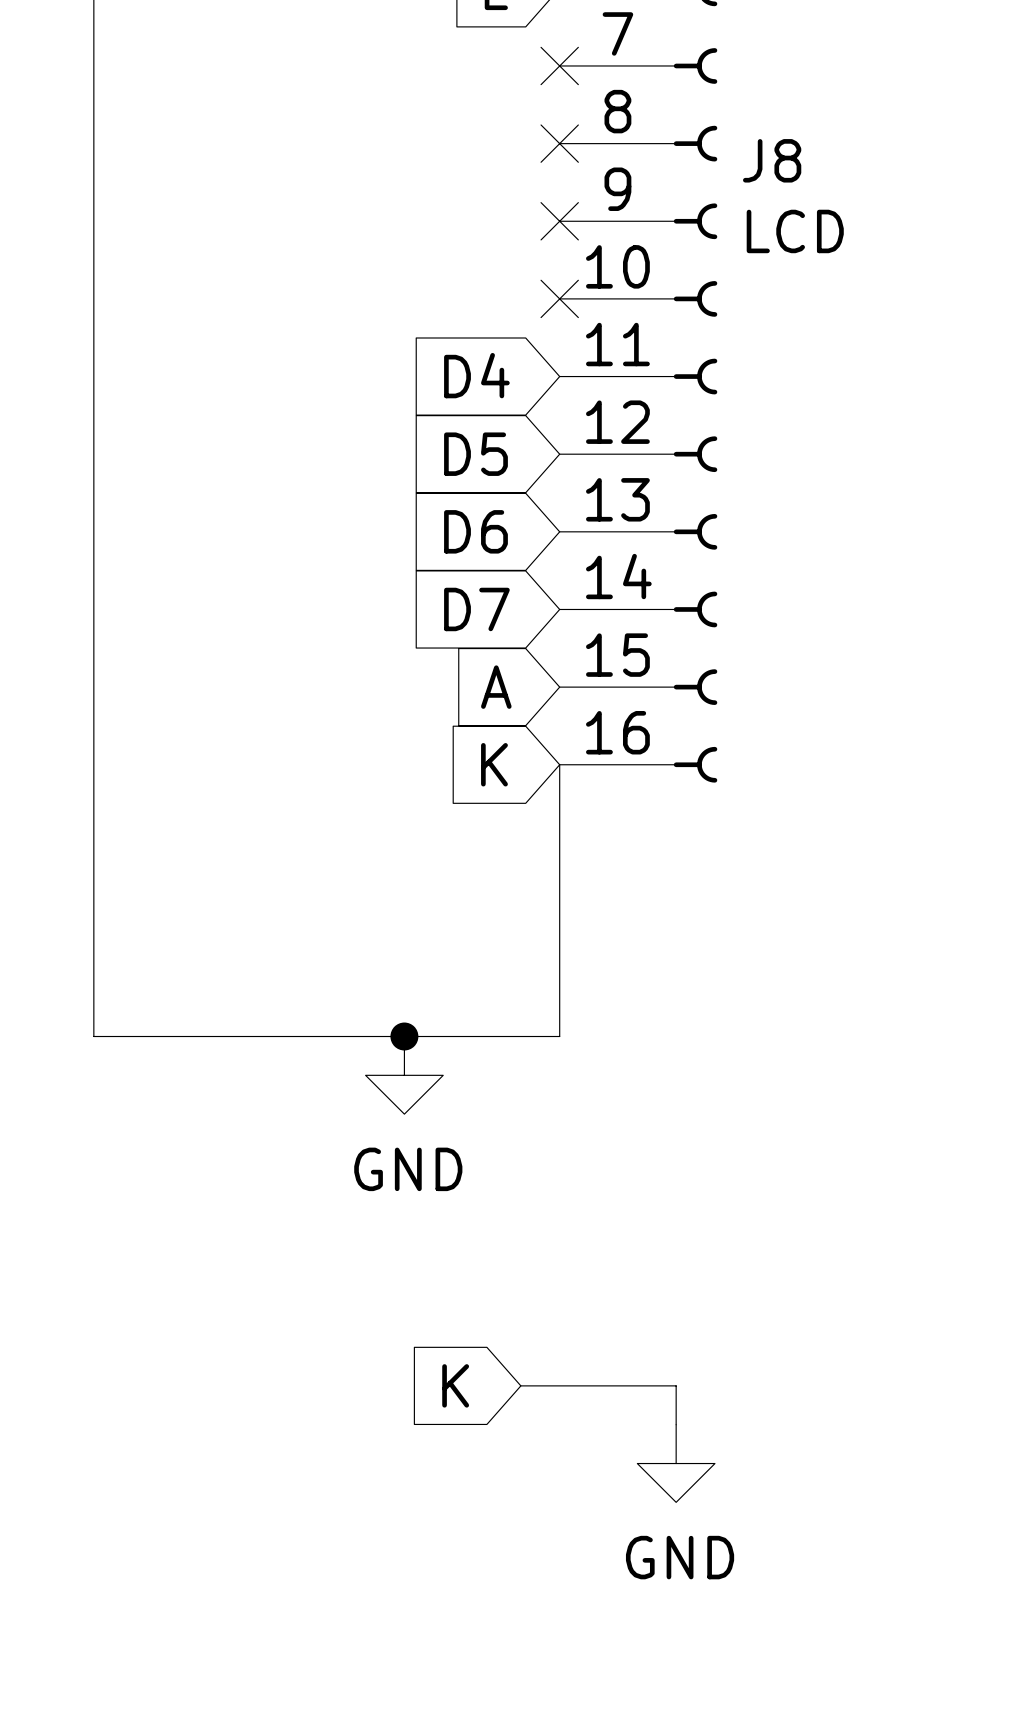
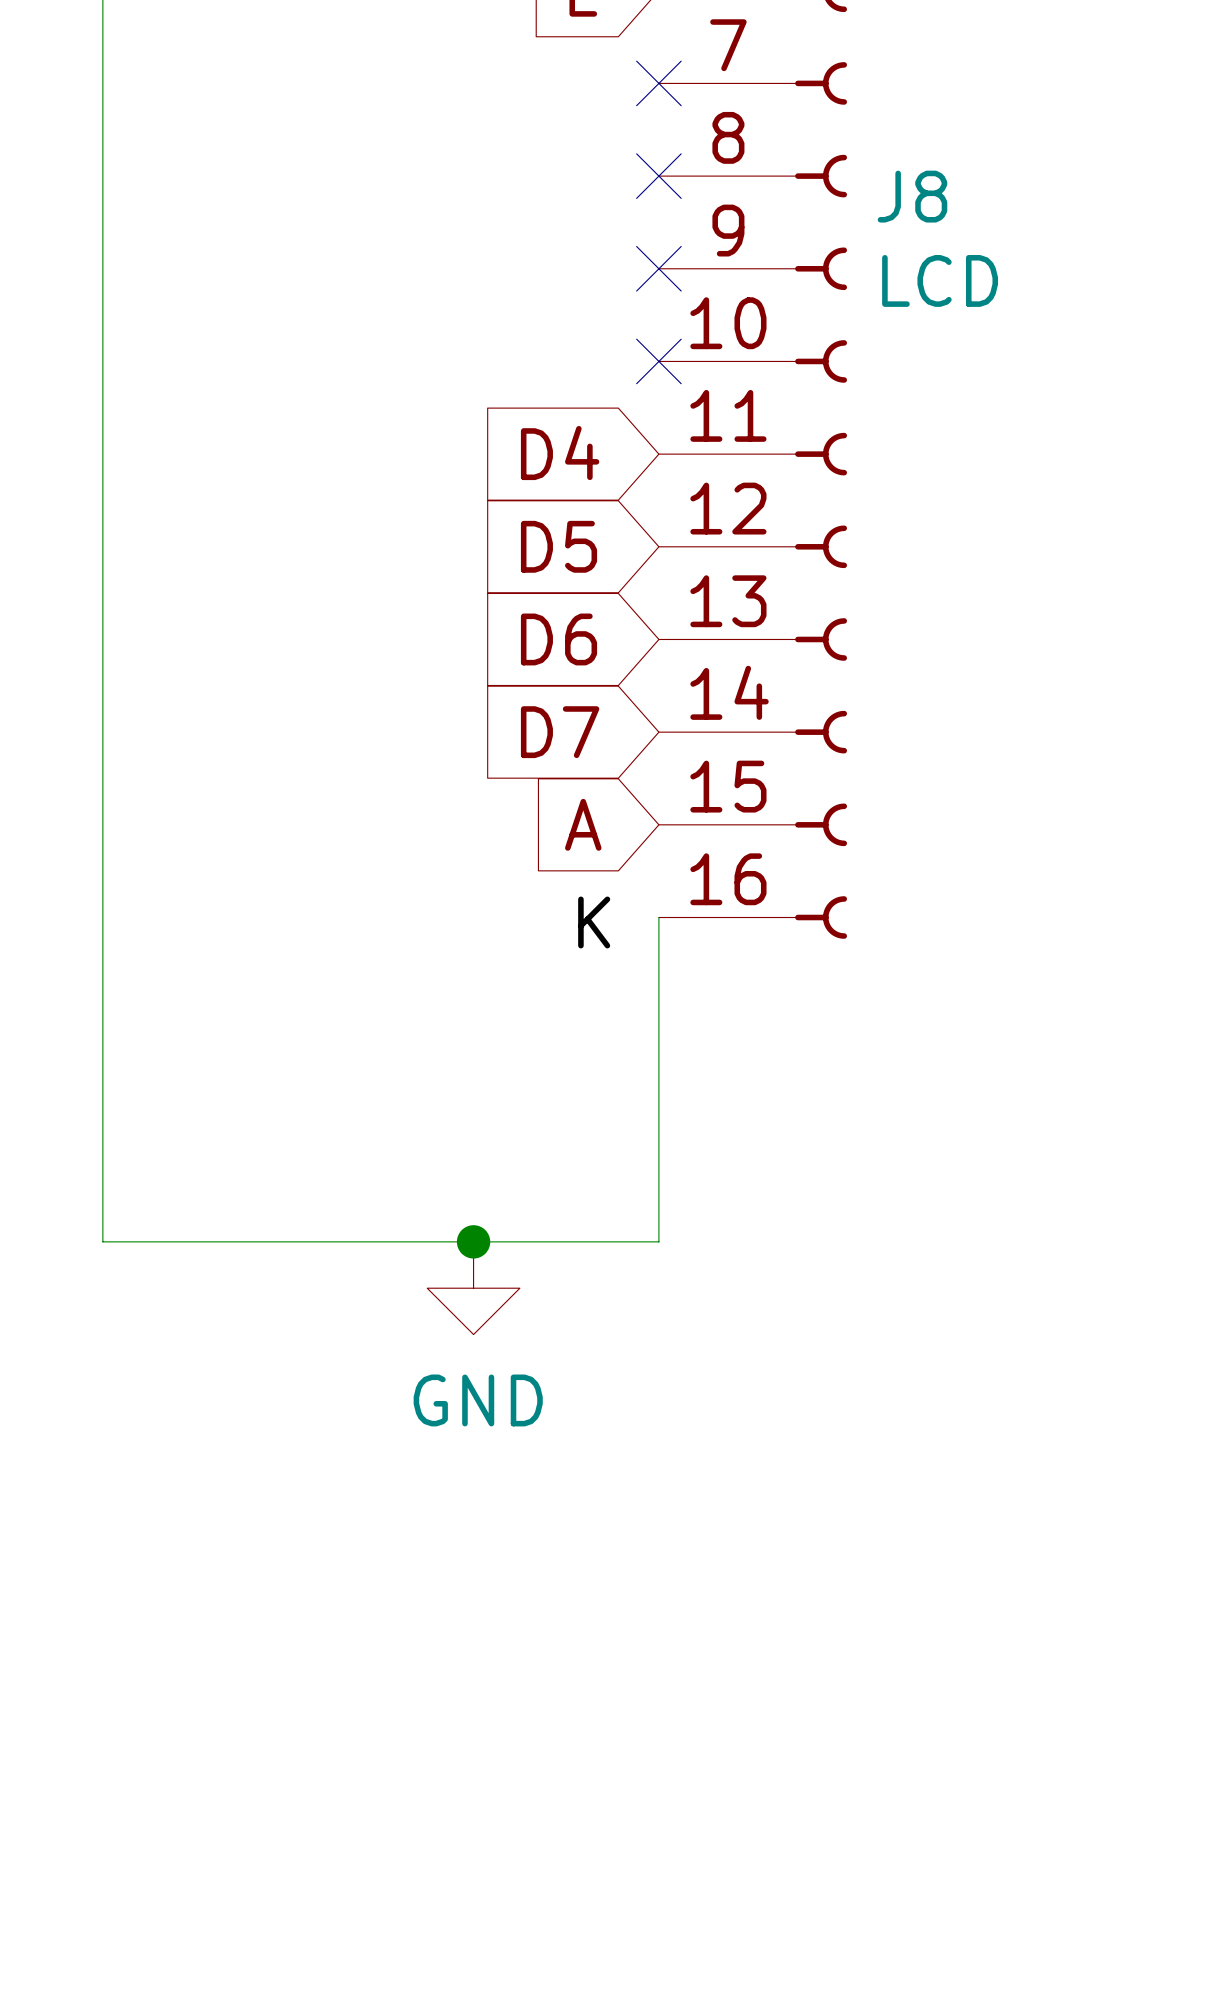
global label: K (494, 764) -> none
label: none -> K (594, 922)
global label: K (455, 1385) -> none
wire: (520, 1385) (676, 1385) (676, 1424) -> none
power symbol: GND (676, 1463) -> none

